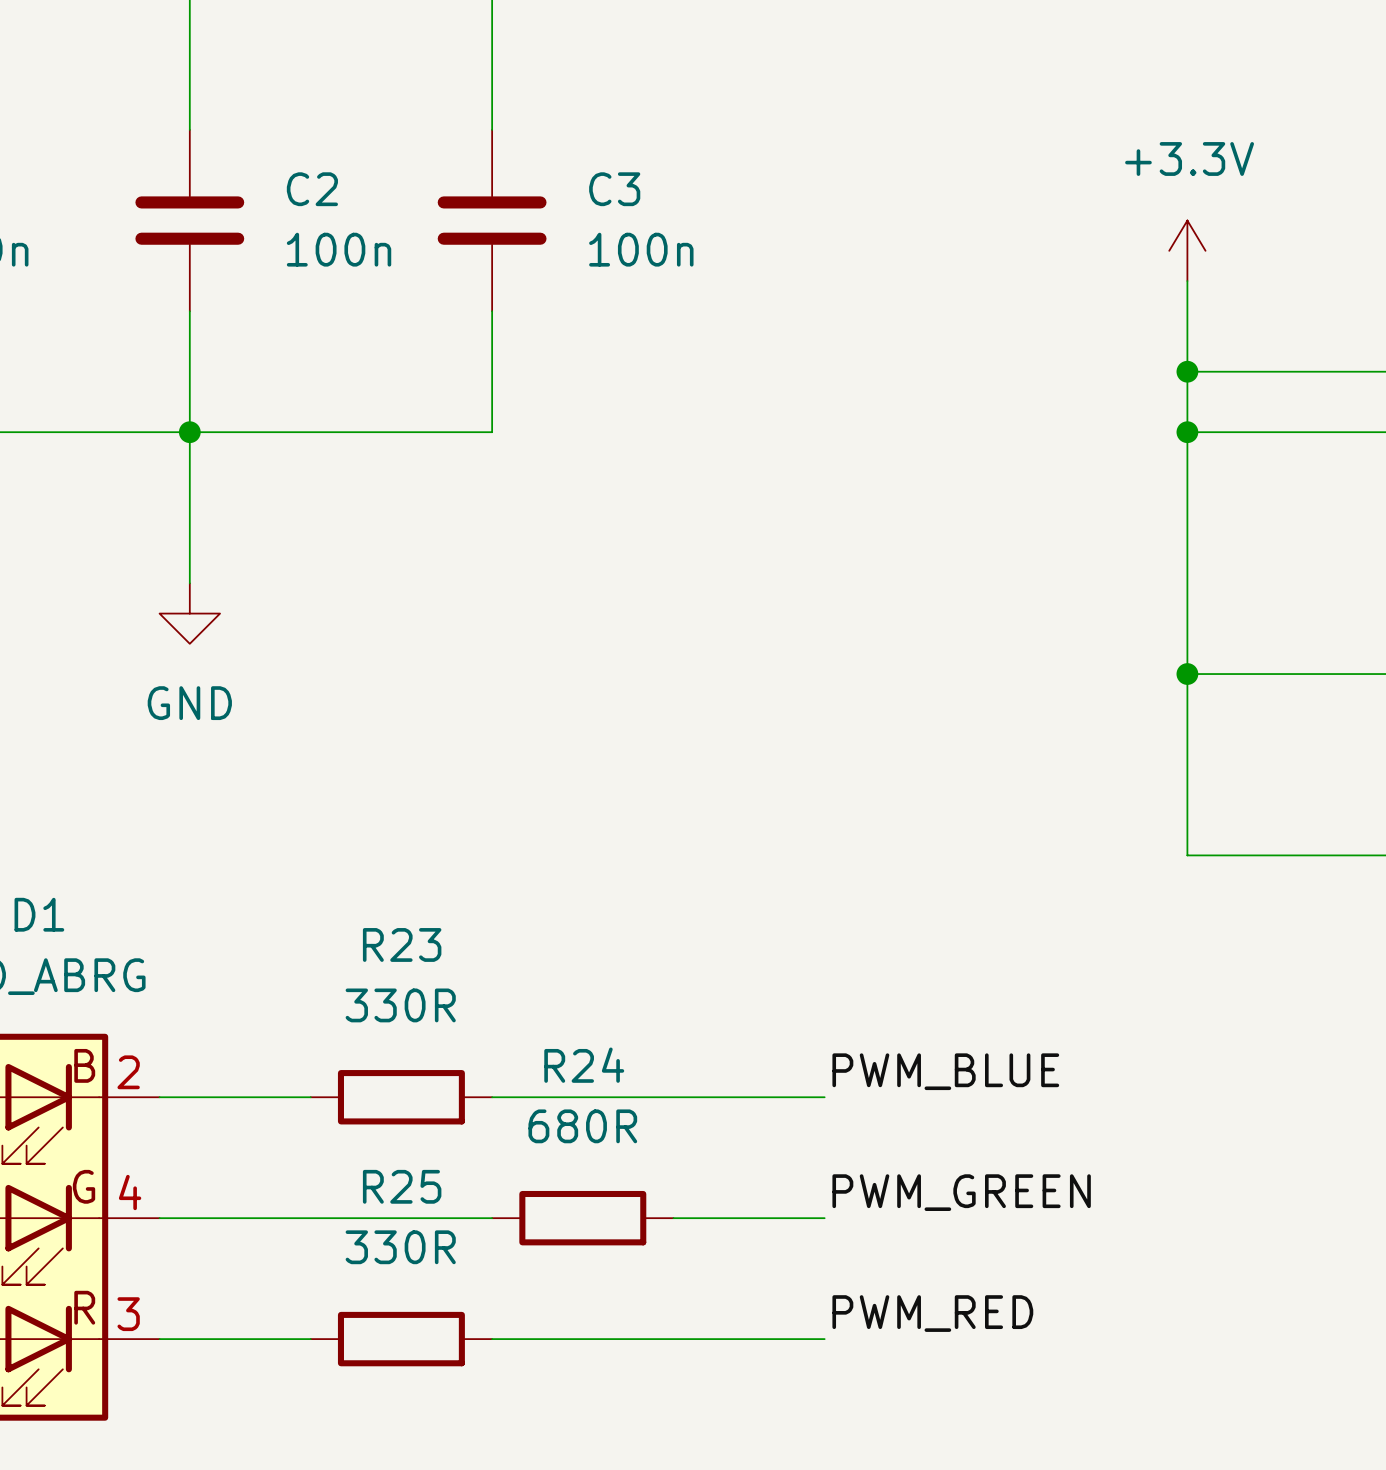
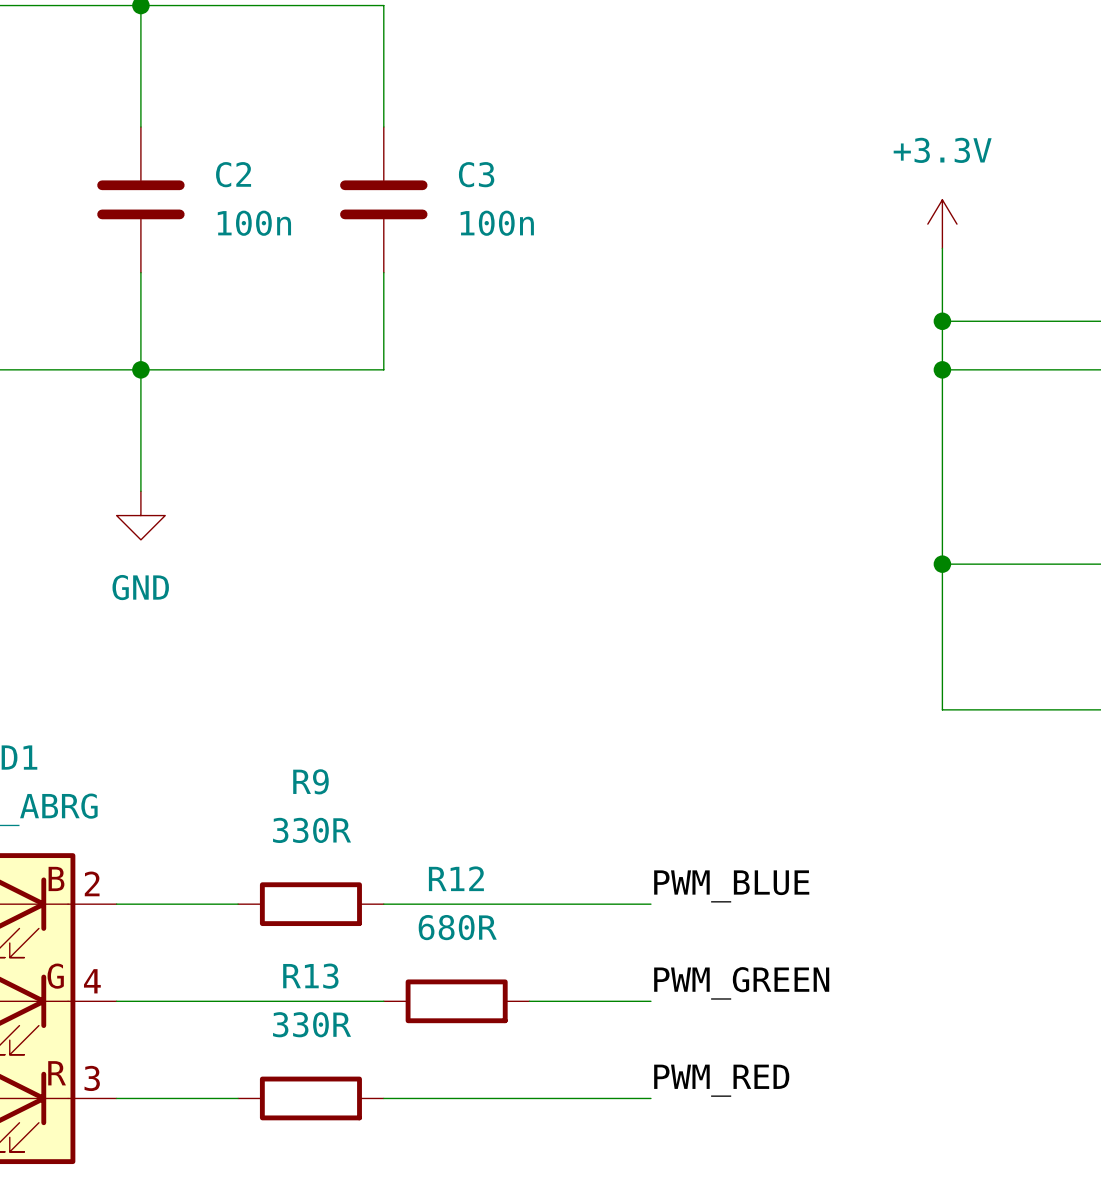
R23 name: R23 (402, 944) -> R9 (310, 781)
R24 name: R24 (584, 1065) -> R12 (456, 878)
R25 name: R25 (402, 1186) -> R13 (310, 976)

